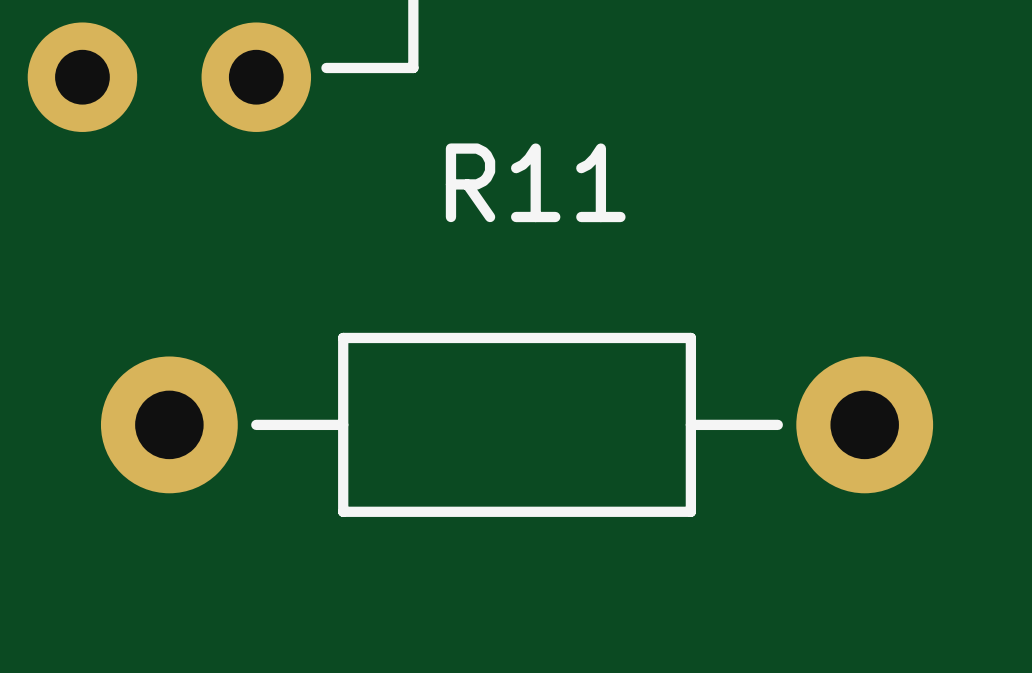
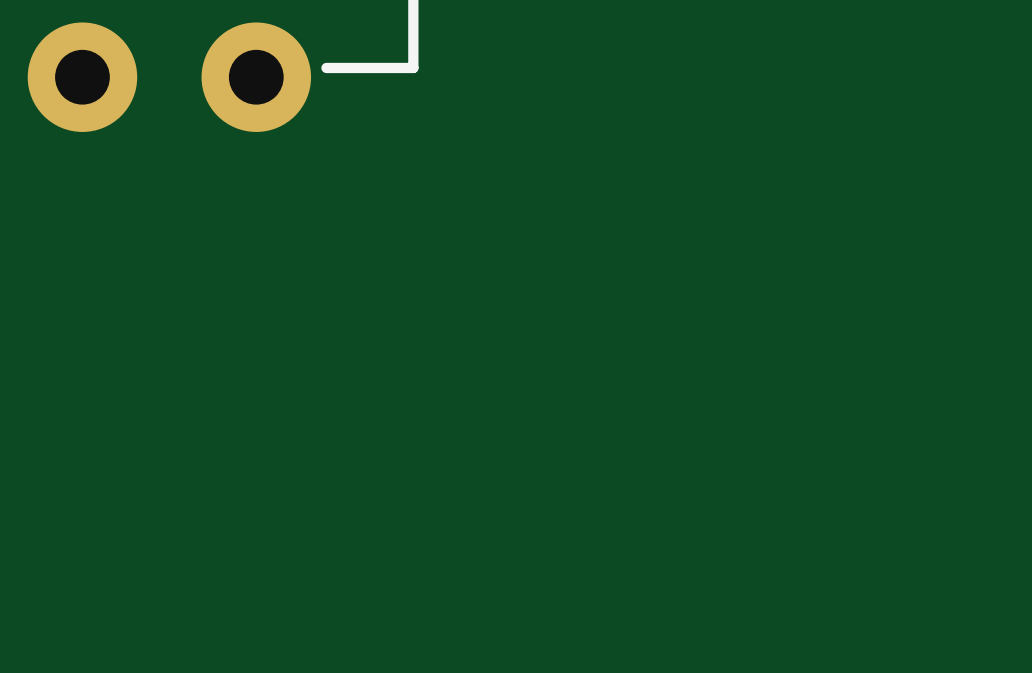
R11: (517, 424) -> none

